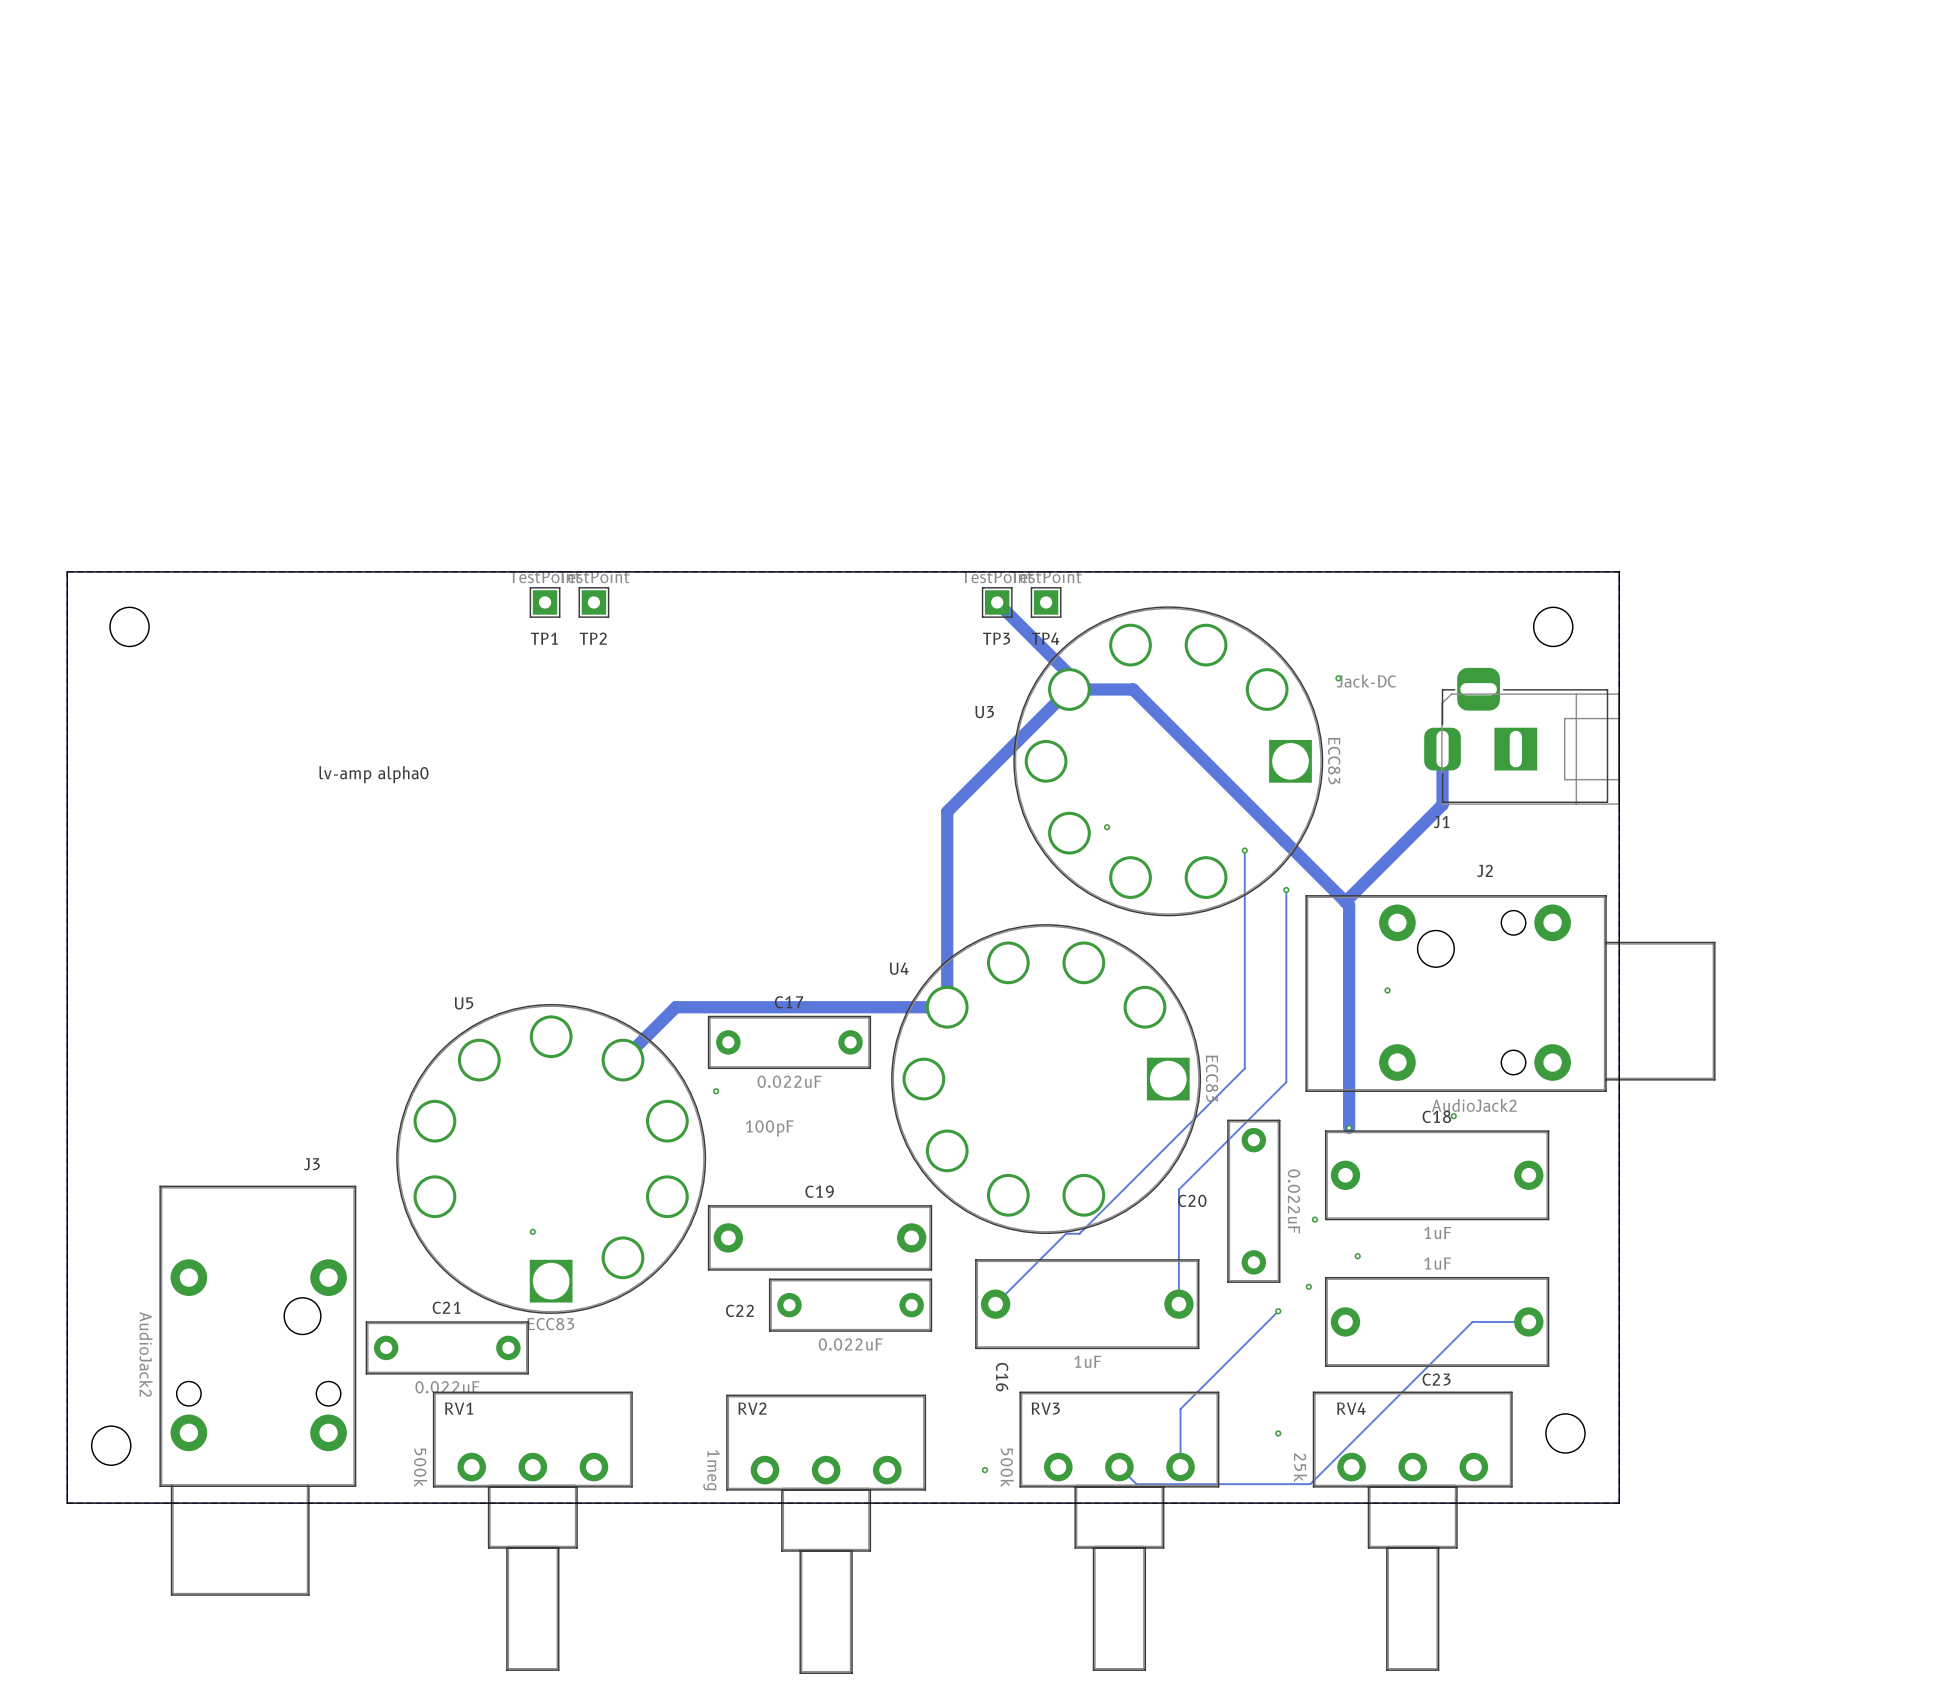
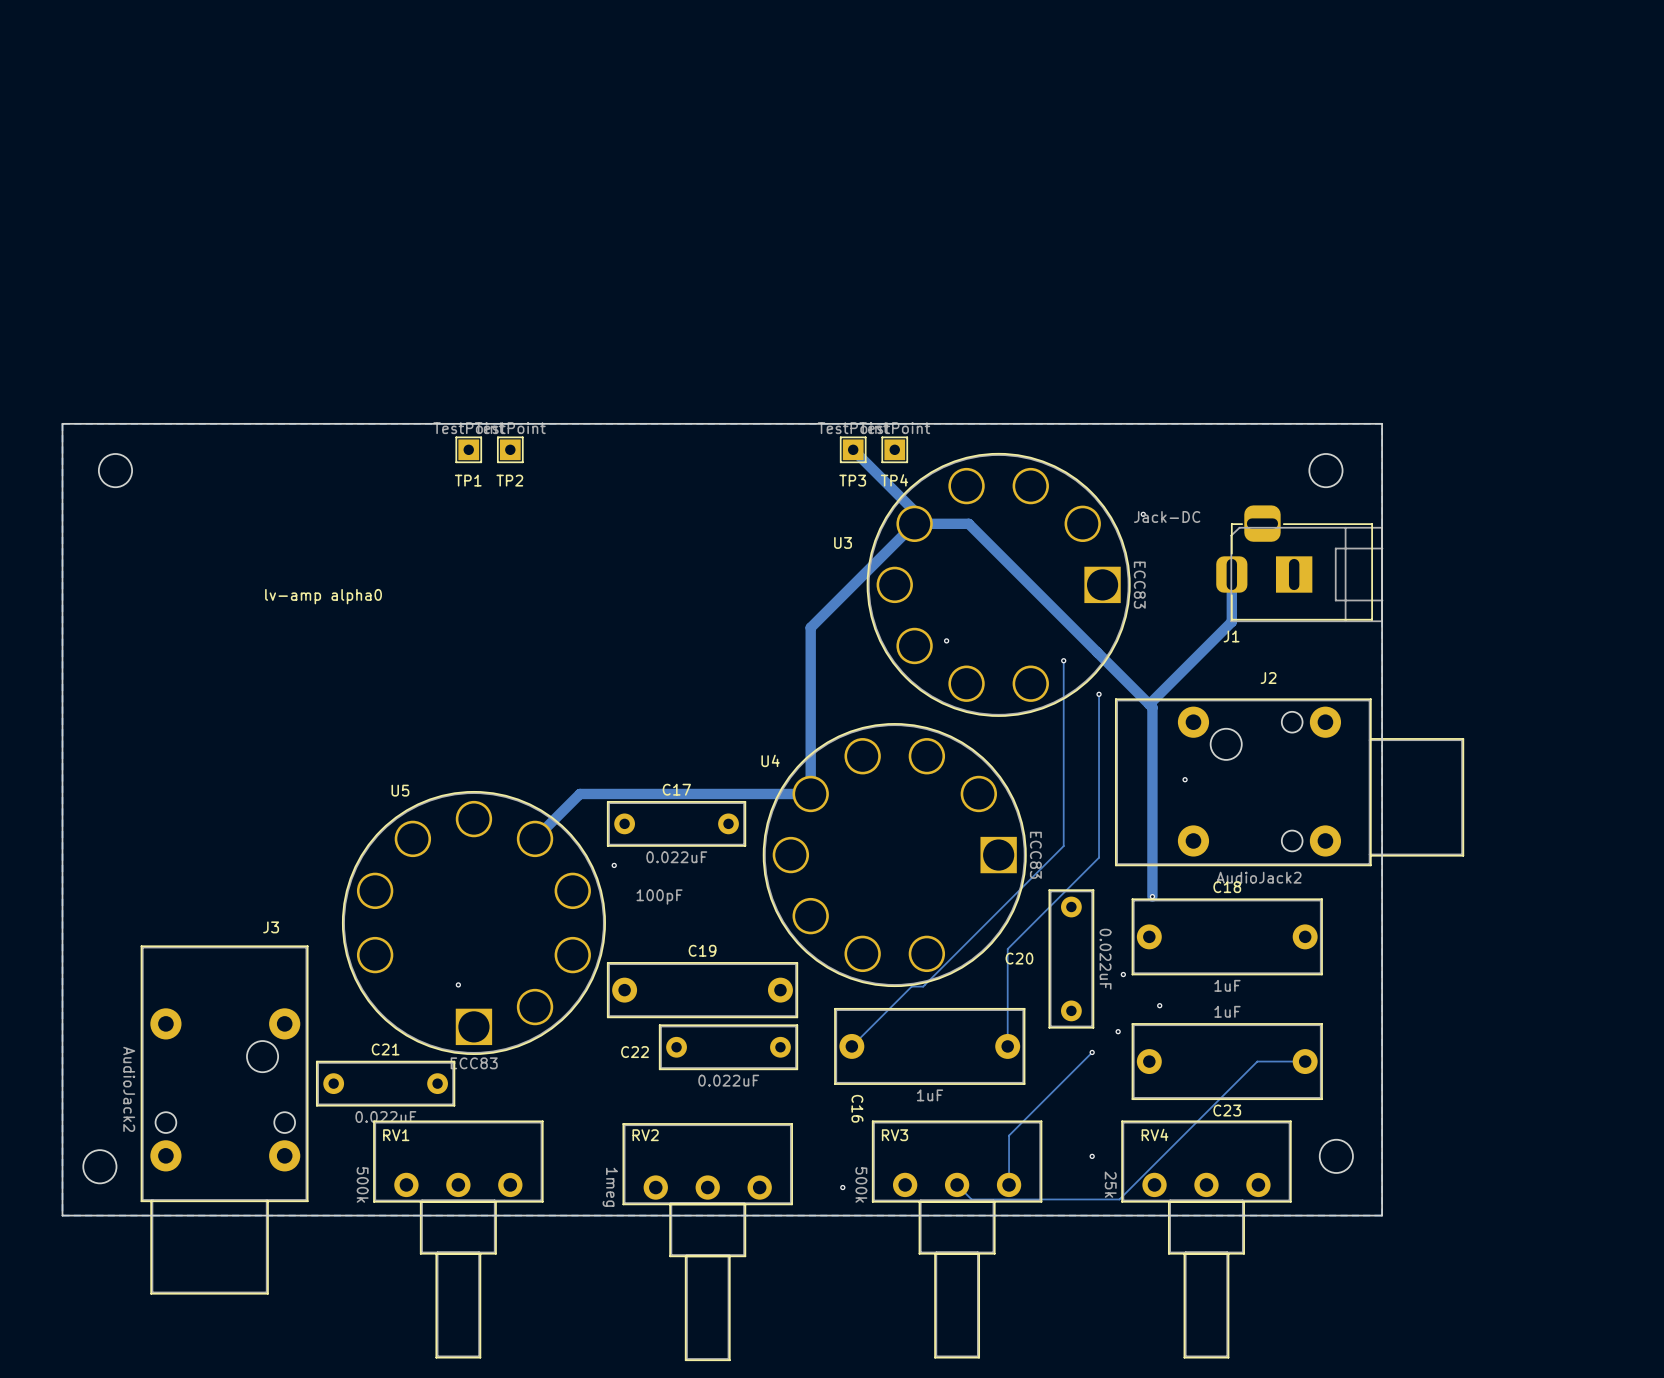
via: (1453, 1116) -> none

